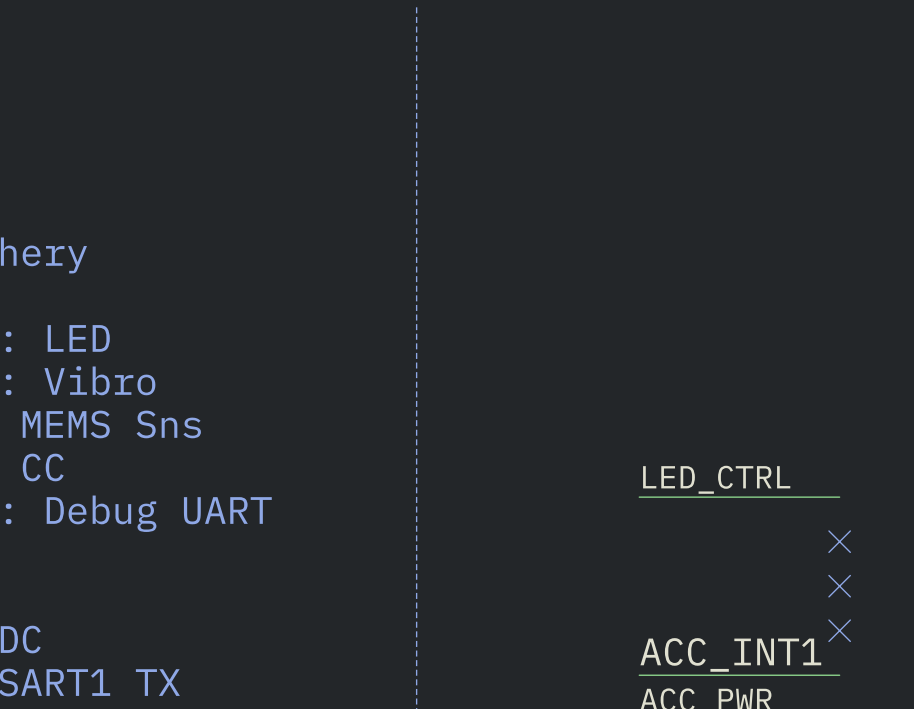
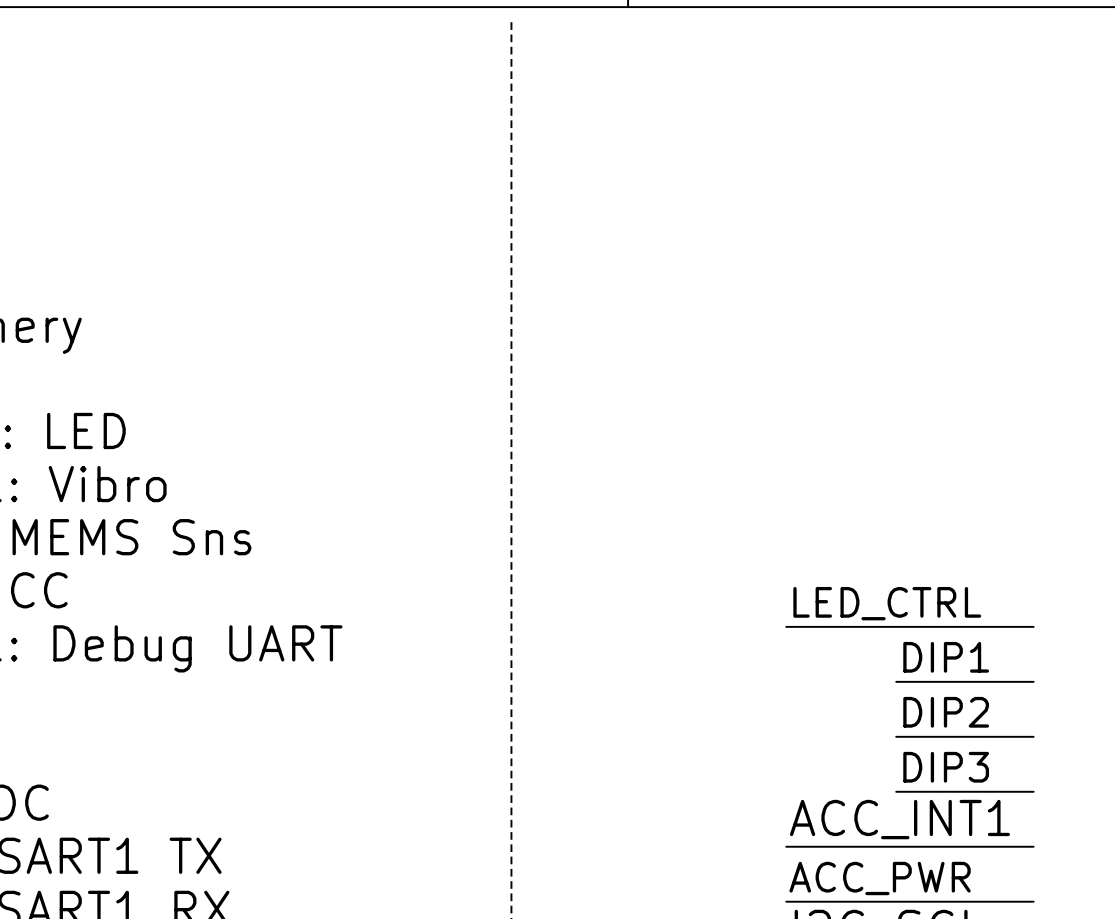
label: none -> DIP1 (946, 657)
wire: none -> (896, 681) (1033, 681)
no-connect mark: (839, 541) -> none
label: none -> DIP2 (946, 712)
wire: none -> (896, 736) (1033, 736)
no-connect mark: (839, 586) -> none
label: none -> DIP3 (946, 767)
wire: none -> (896, 791) (1033, 791)
no-connect mark: (839, 630) -> none

